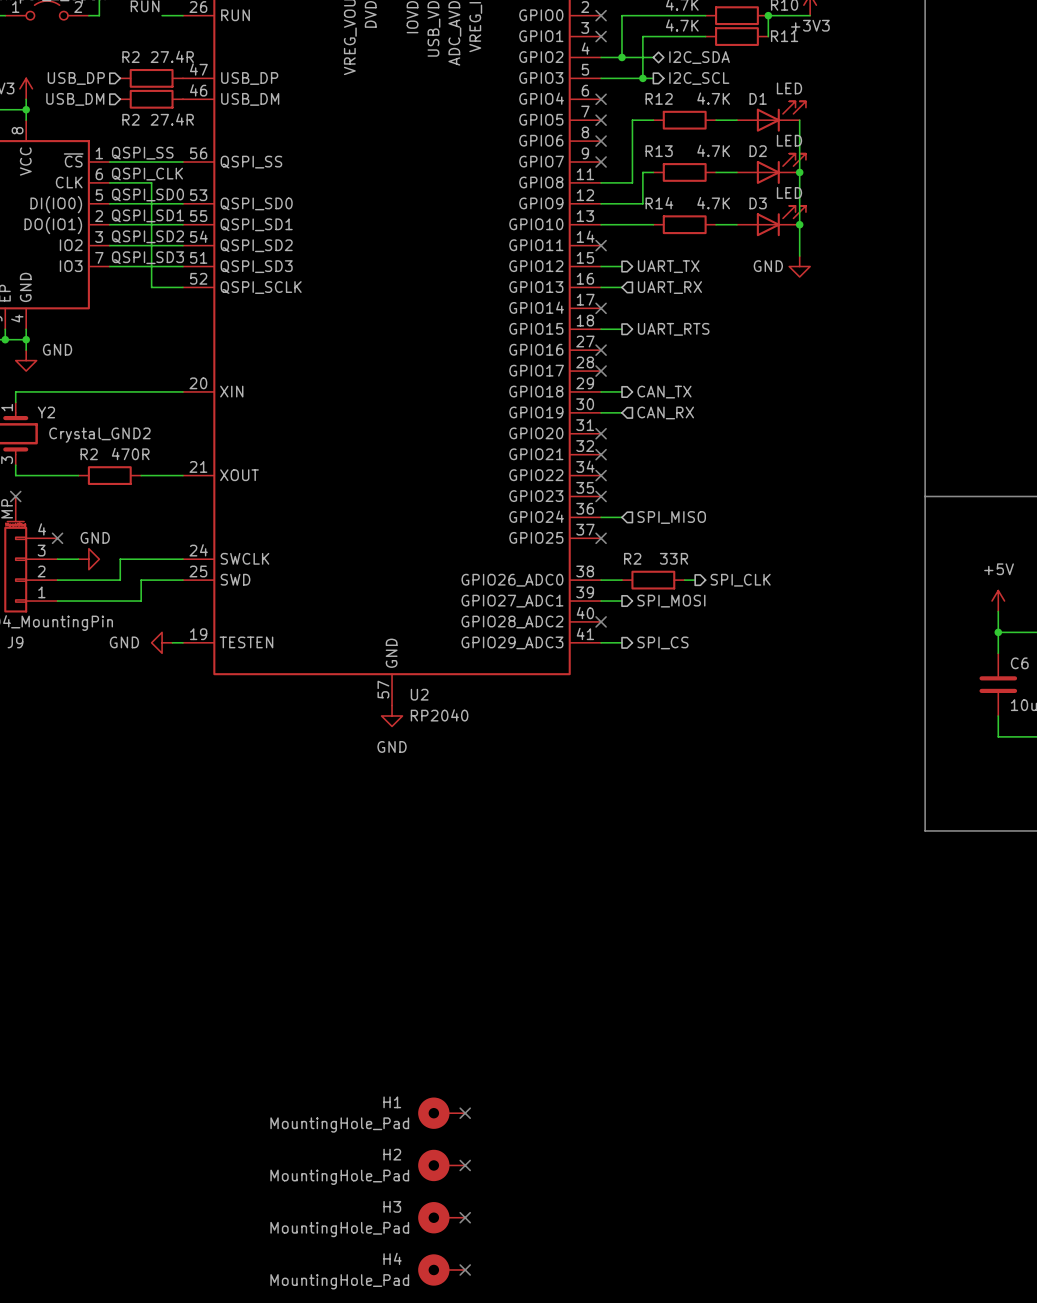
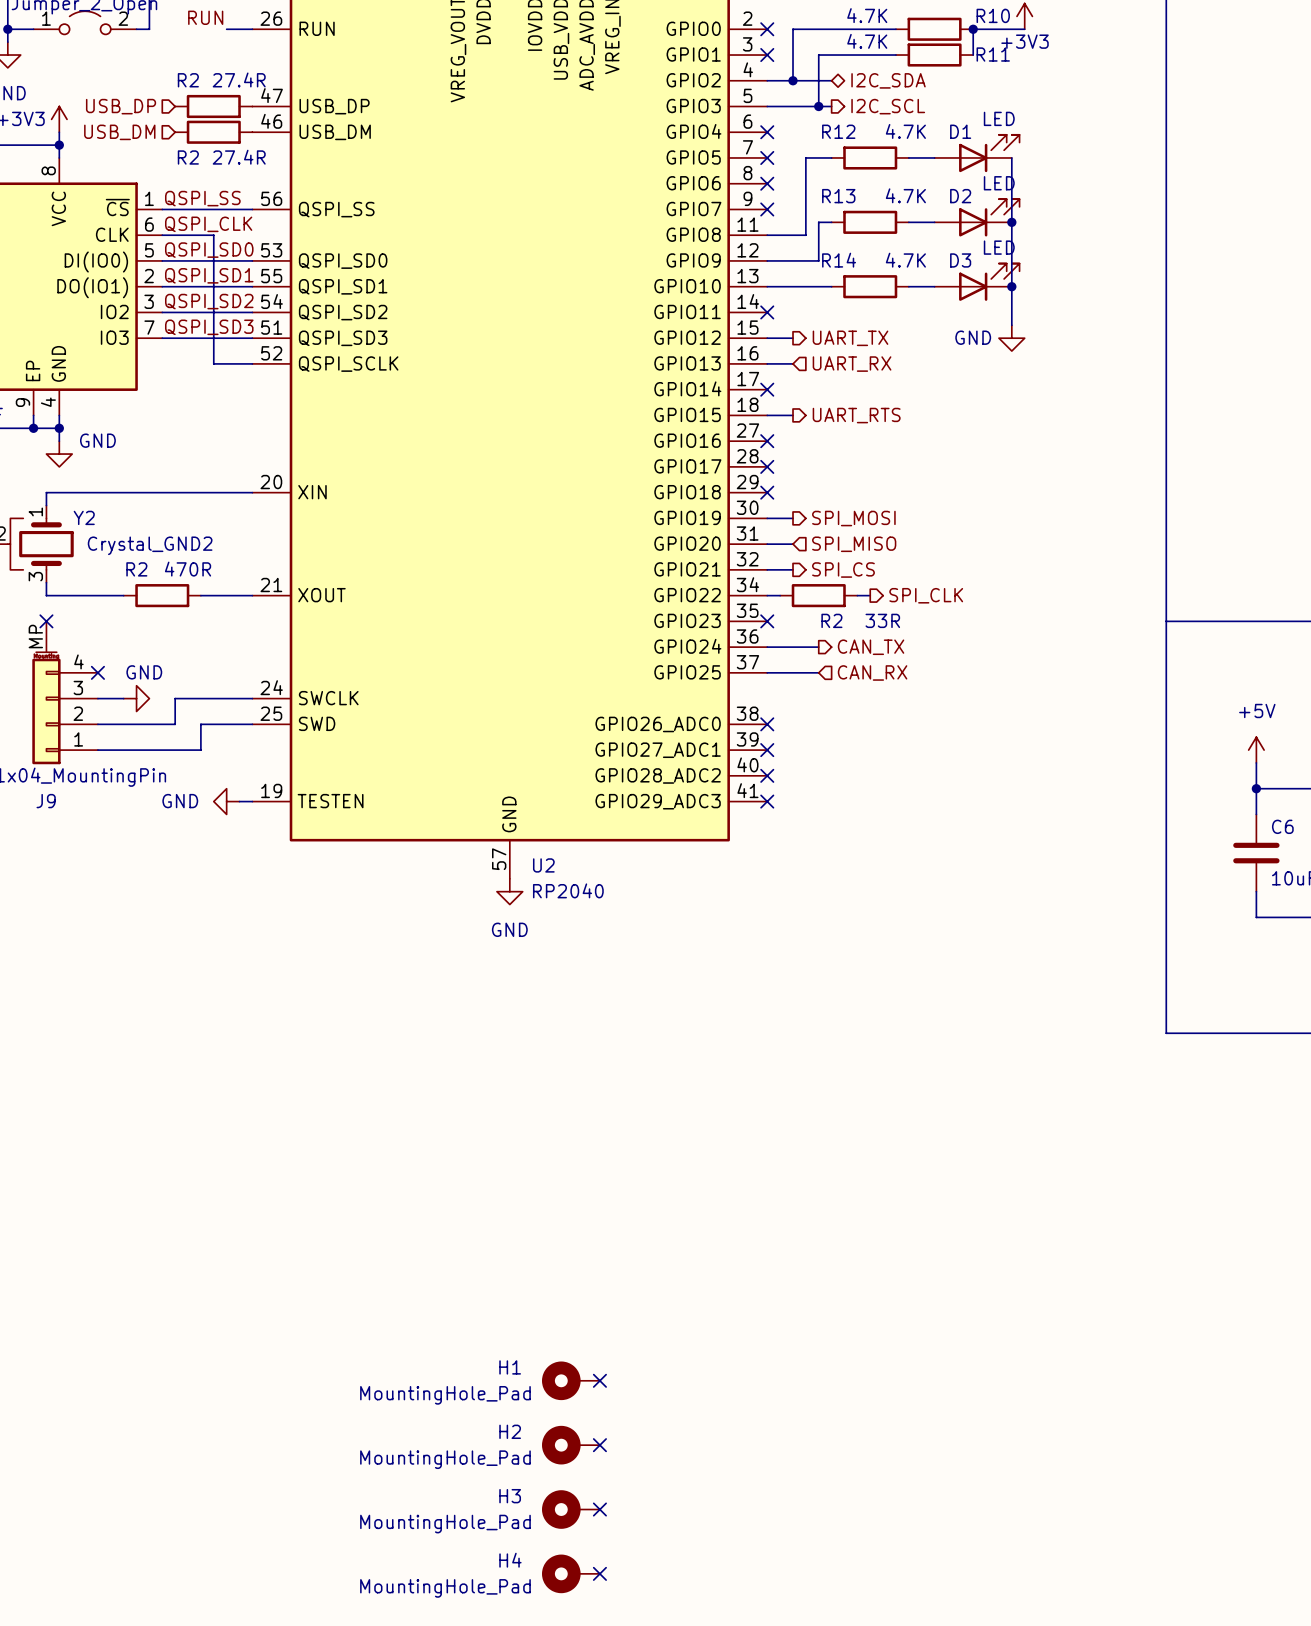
wire: (601, 391) (621, 391) -> (793, 647) (818, 647)
no-connect mark: none -> (767, 492)
hierarchical label position: CAN_TX (664, 392) -> CAN_TX (871, 647)
hierarchical label shape: input (665, 412) -> output (853, 518)
hierarchical label: CAN_RX (665, 412) -> SPI_MOSI (853, 518)
no-connect mark: (601, 433) -> none
no-connect mark: (601, 454) -> none
wire: none -> (767, 595) (780, 595)
no-connect mark: (601, 475) -> none
hierarchical label position: SPI_MISO (671, 517) -> SPI_MISO (854, 544)
wire: none -> (767, 672) (818, 672)
no-connect mark: (601, 538) -> none
hierarchical label: none -> CAN_RX (872, 672)
R2 name position: R2 (632, 558) -> R2 (831, 620)
R2 value position: 33R (674, 558) -> 33R (882, 620)
wire: (601, 580) (621, 580) -> (767, 544) (793, 544)
no-connect mark: none -> (767, 724)
R2 position: (653, 580) -> (818, 595)
wire: (684, 580) (695, 580) -> (857, 595) (870, 595)
hierarchical label position: SPI_CLK (740, 580) -> SPI_CLK (926, 595)
wire: (601, 601) (621, 601) -> (767, 569) (793, 569)
no-connect mark: none -> (767, 750)
hierarchical label: SPI_MOSI (671, 601) -> none
wire: (601, 642) (621, 642) -> none
no-connect mark: none -> (767, 801)
hierarchical label position: SPI_CS (662, 642) -> SPI_CS (843, 570)

